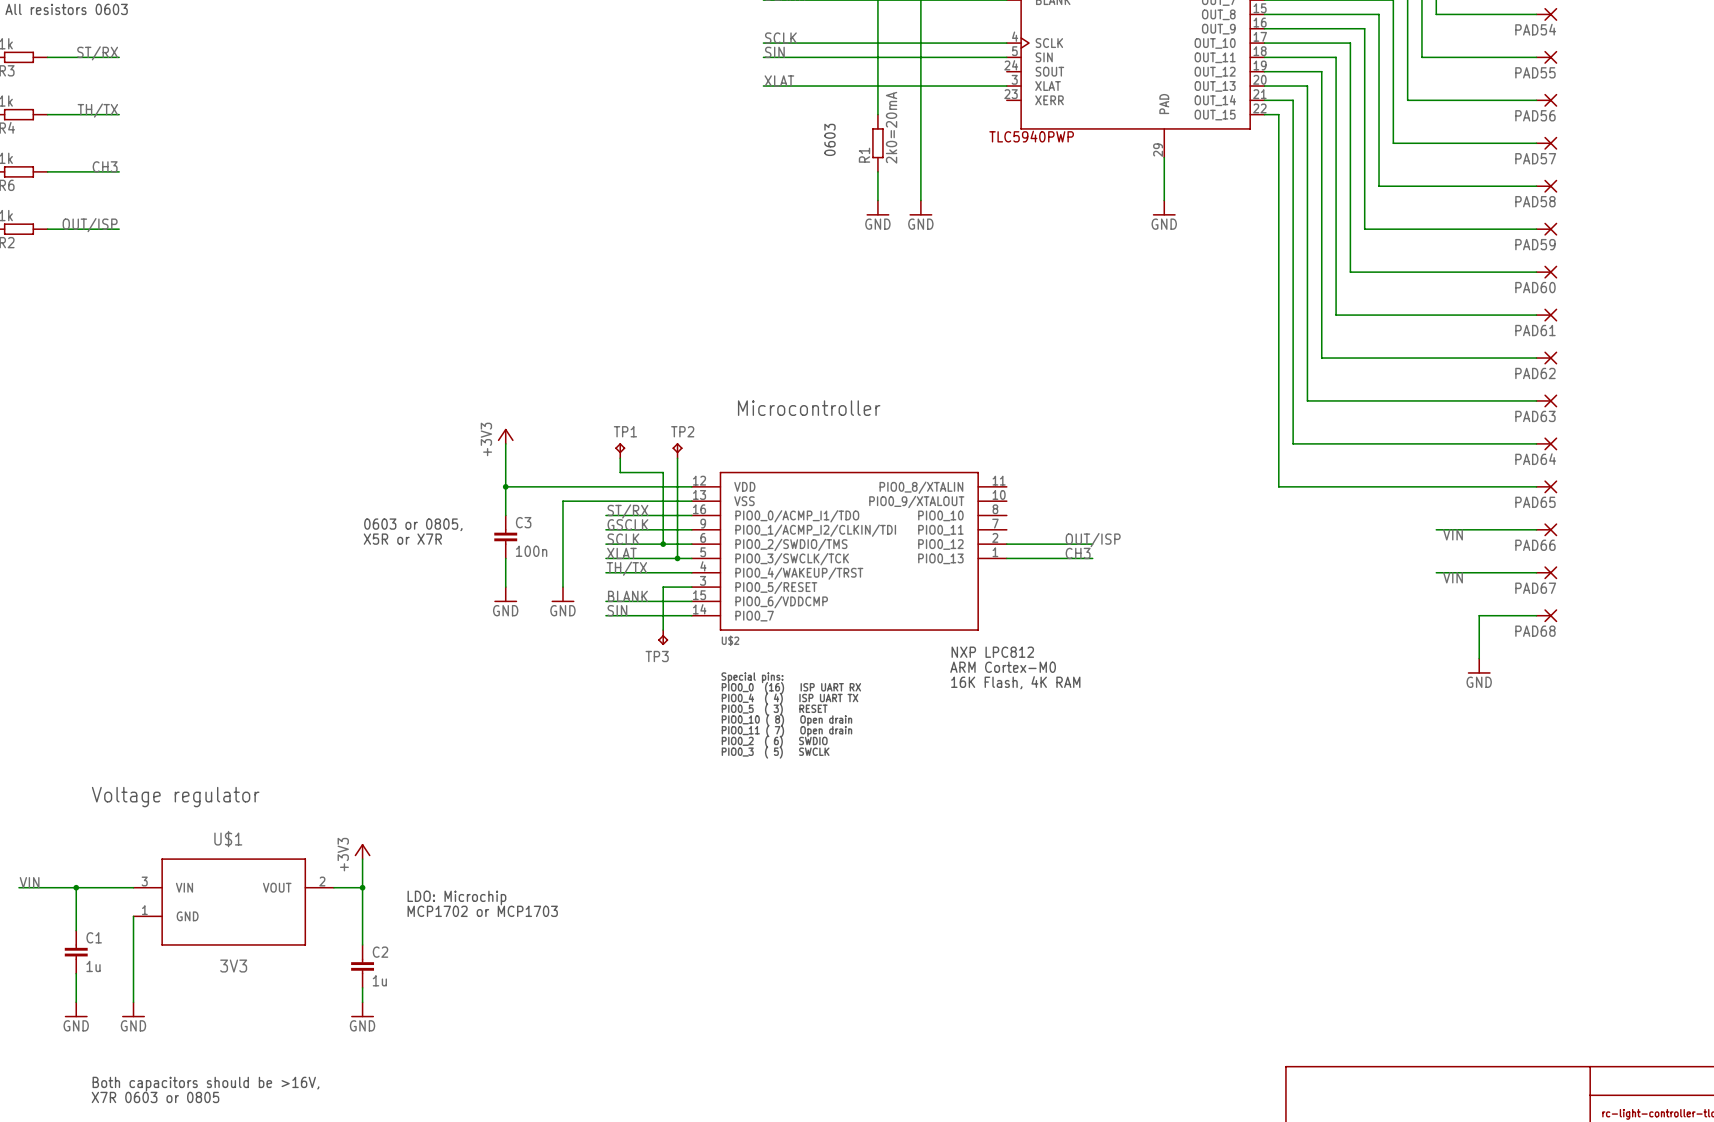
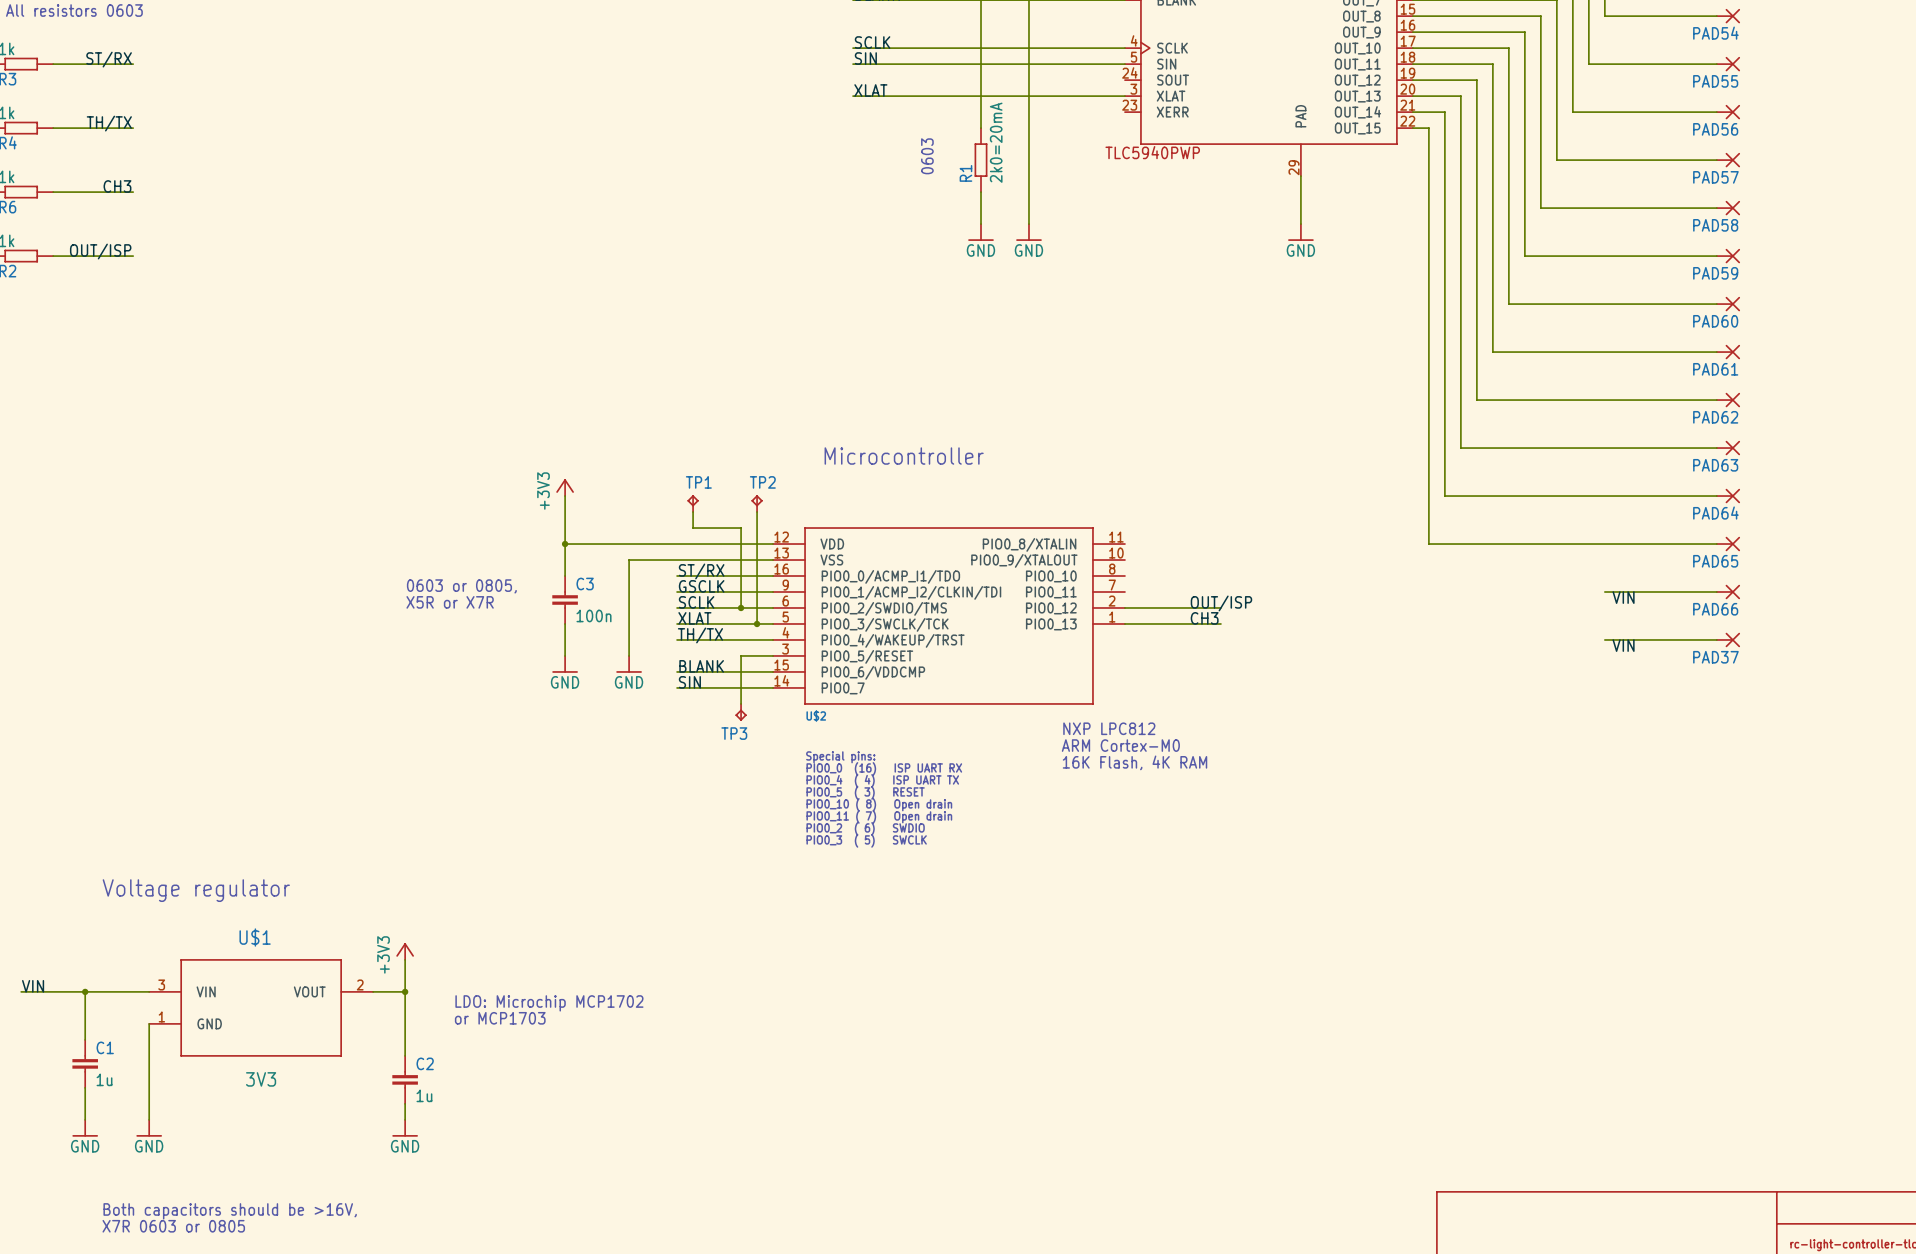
PAD67 name: PAD67 (1535, 588) -> PAD37 (1715, 657)
wire: (1536, 615) (1479, 615) (1479, 658) -> none
PAD68: (1546, 615) -> none
power symbol: GND (1479, 666) -> none
text: LDO: Microchip (456, 897) -> LDO: Microchip MCP1702 (549, 1003)
text: MCP1702 or MCP1703 (482, 911) -> or MCP1703 (500, 1018)

